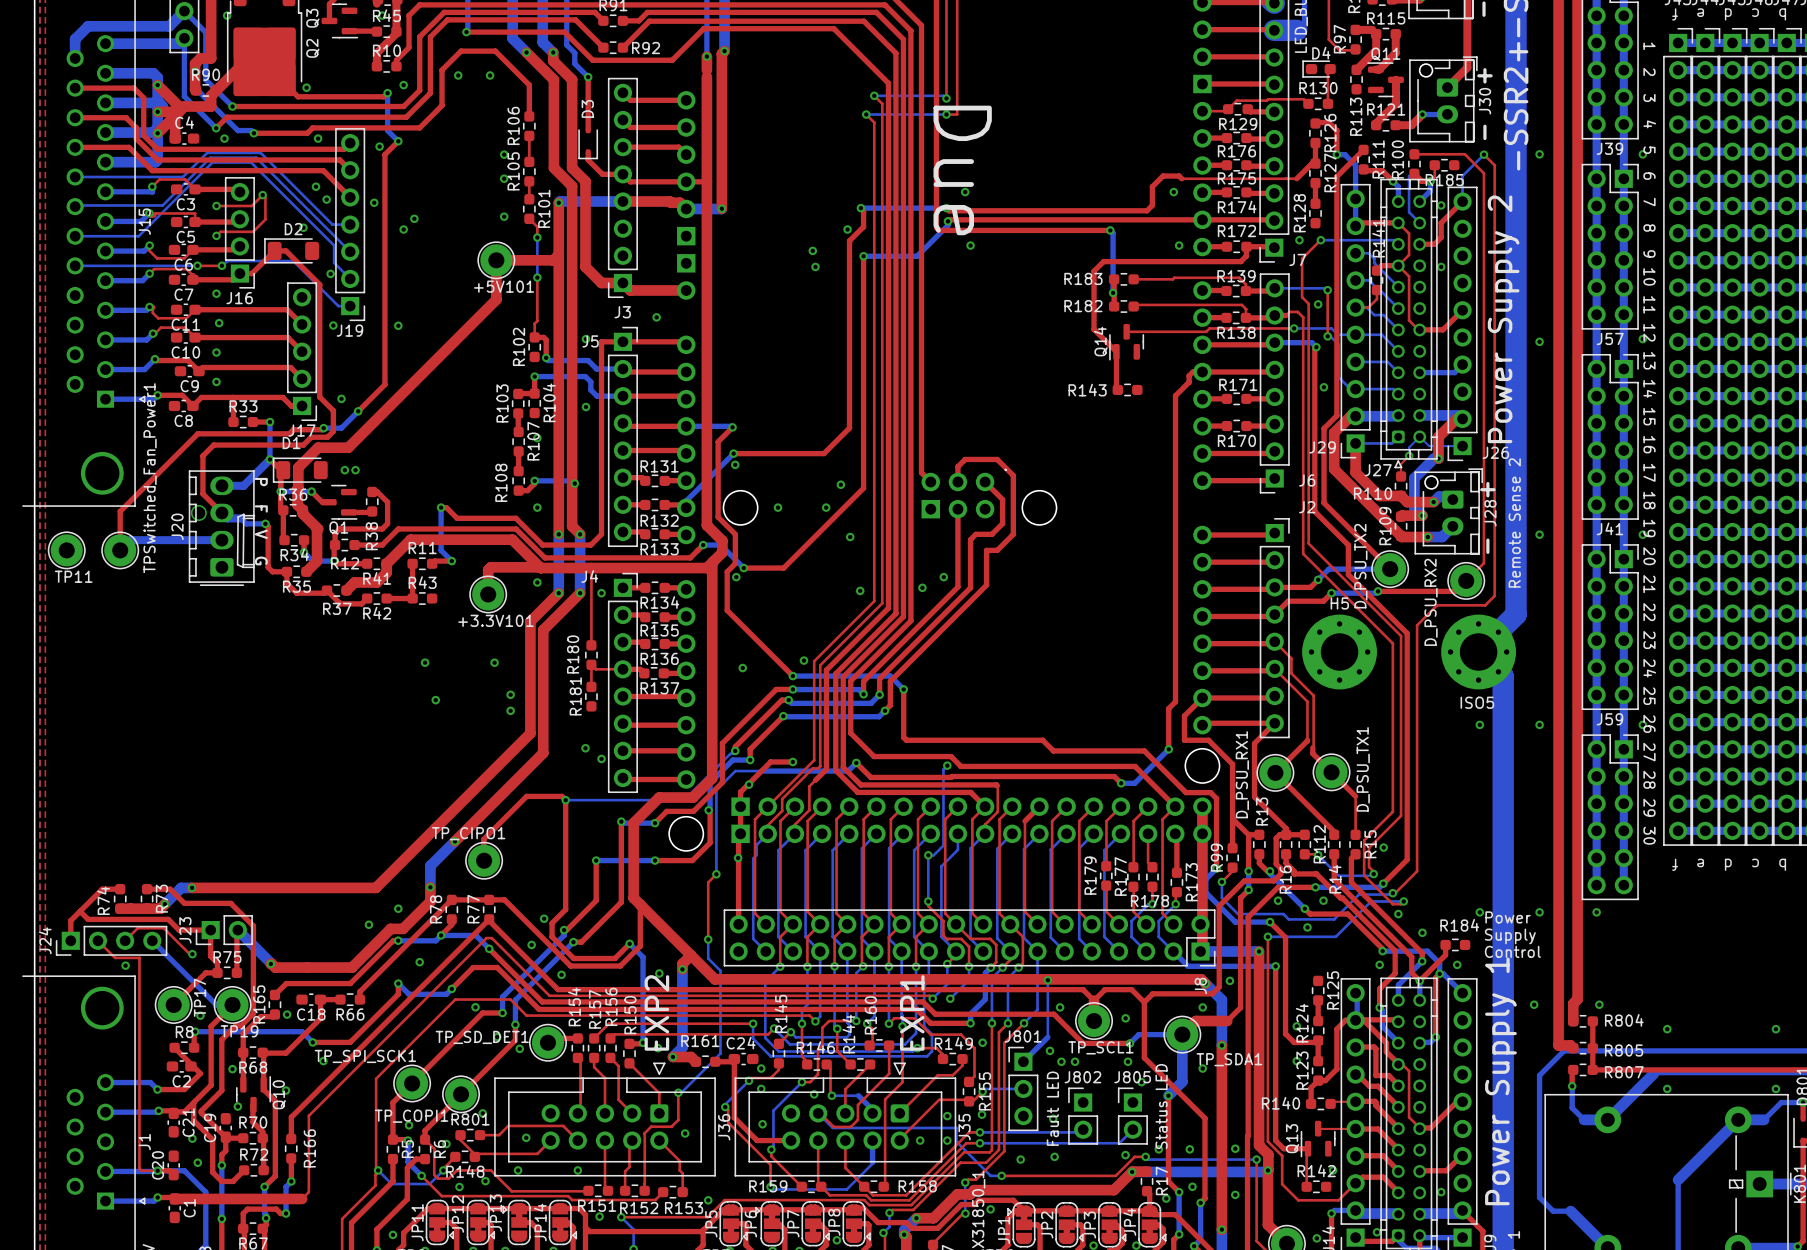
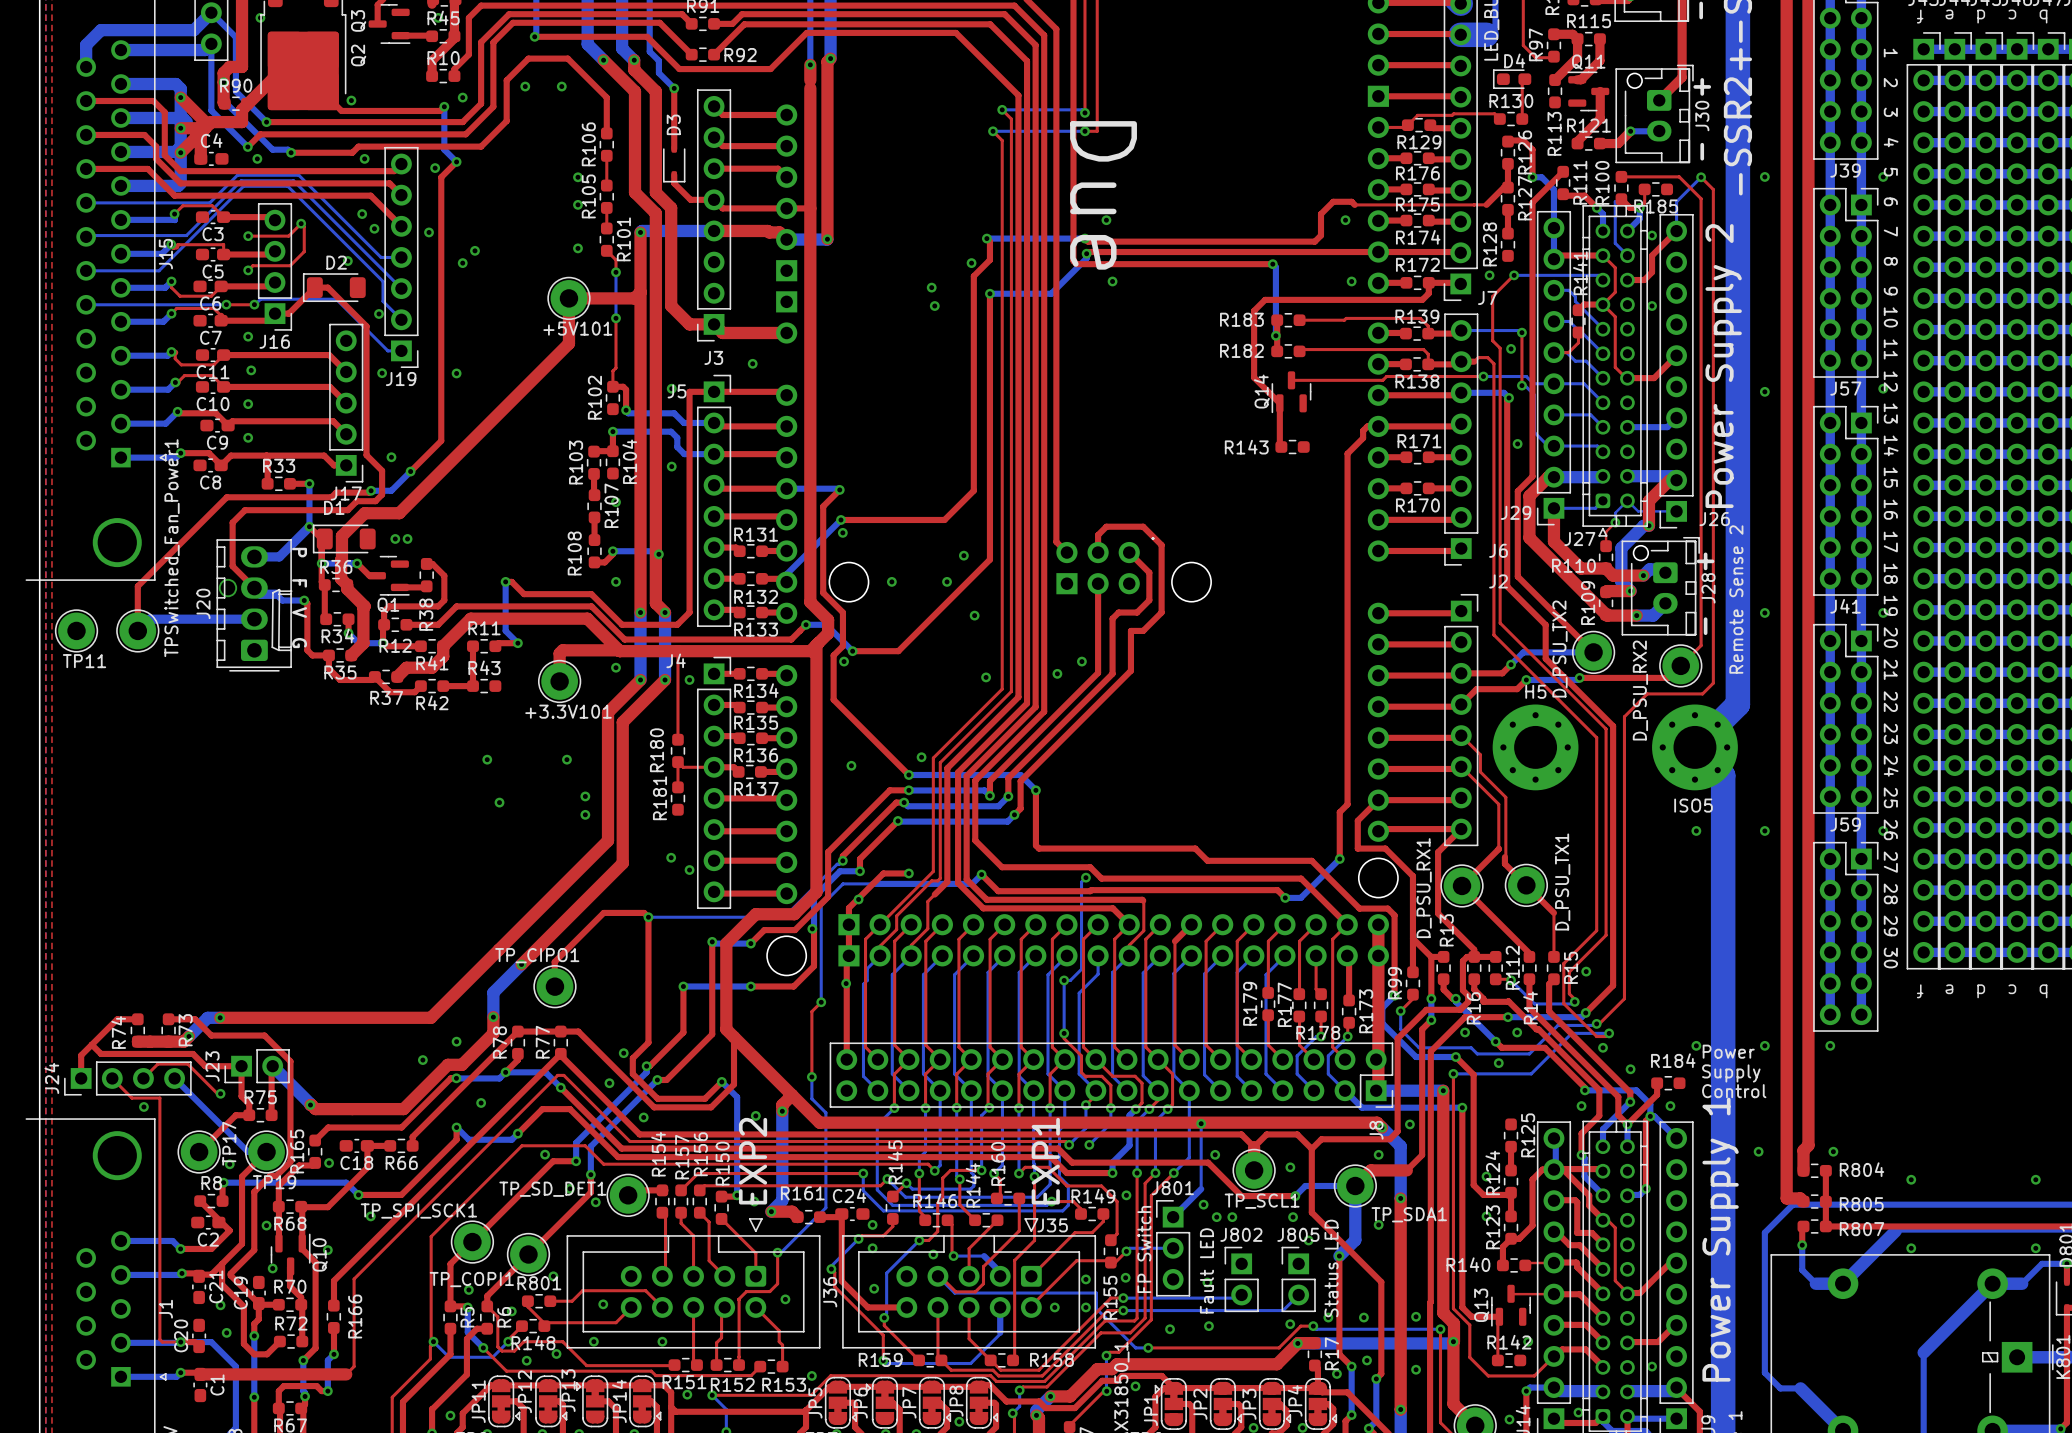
text: none -> FP Switch (1144, 1249)
R155 name position: R155 (984, 1091) -> R155 (1110, 1297)
J35 name rotation: 0° (964, 1127) -> 90° clockwise (1052, 1225)
J35 name position: J35 (964, 1127) -> J35 (1052, 1225)

